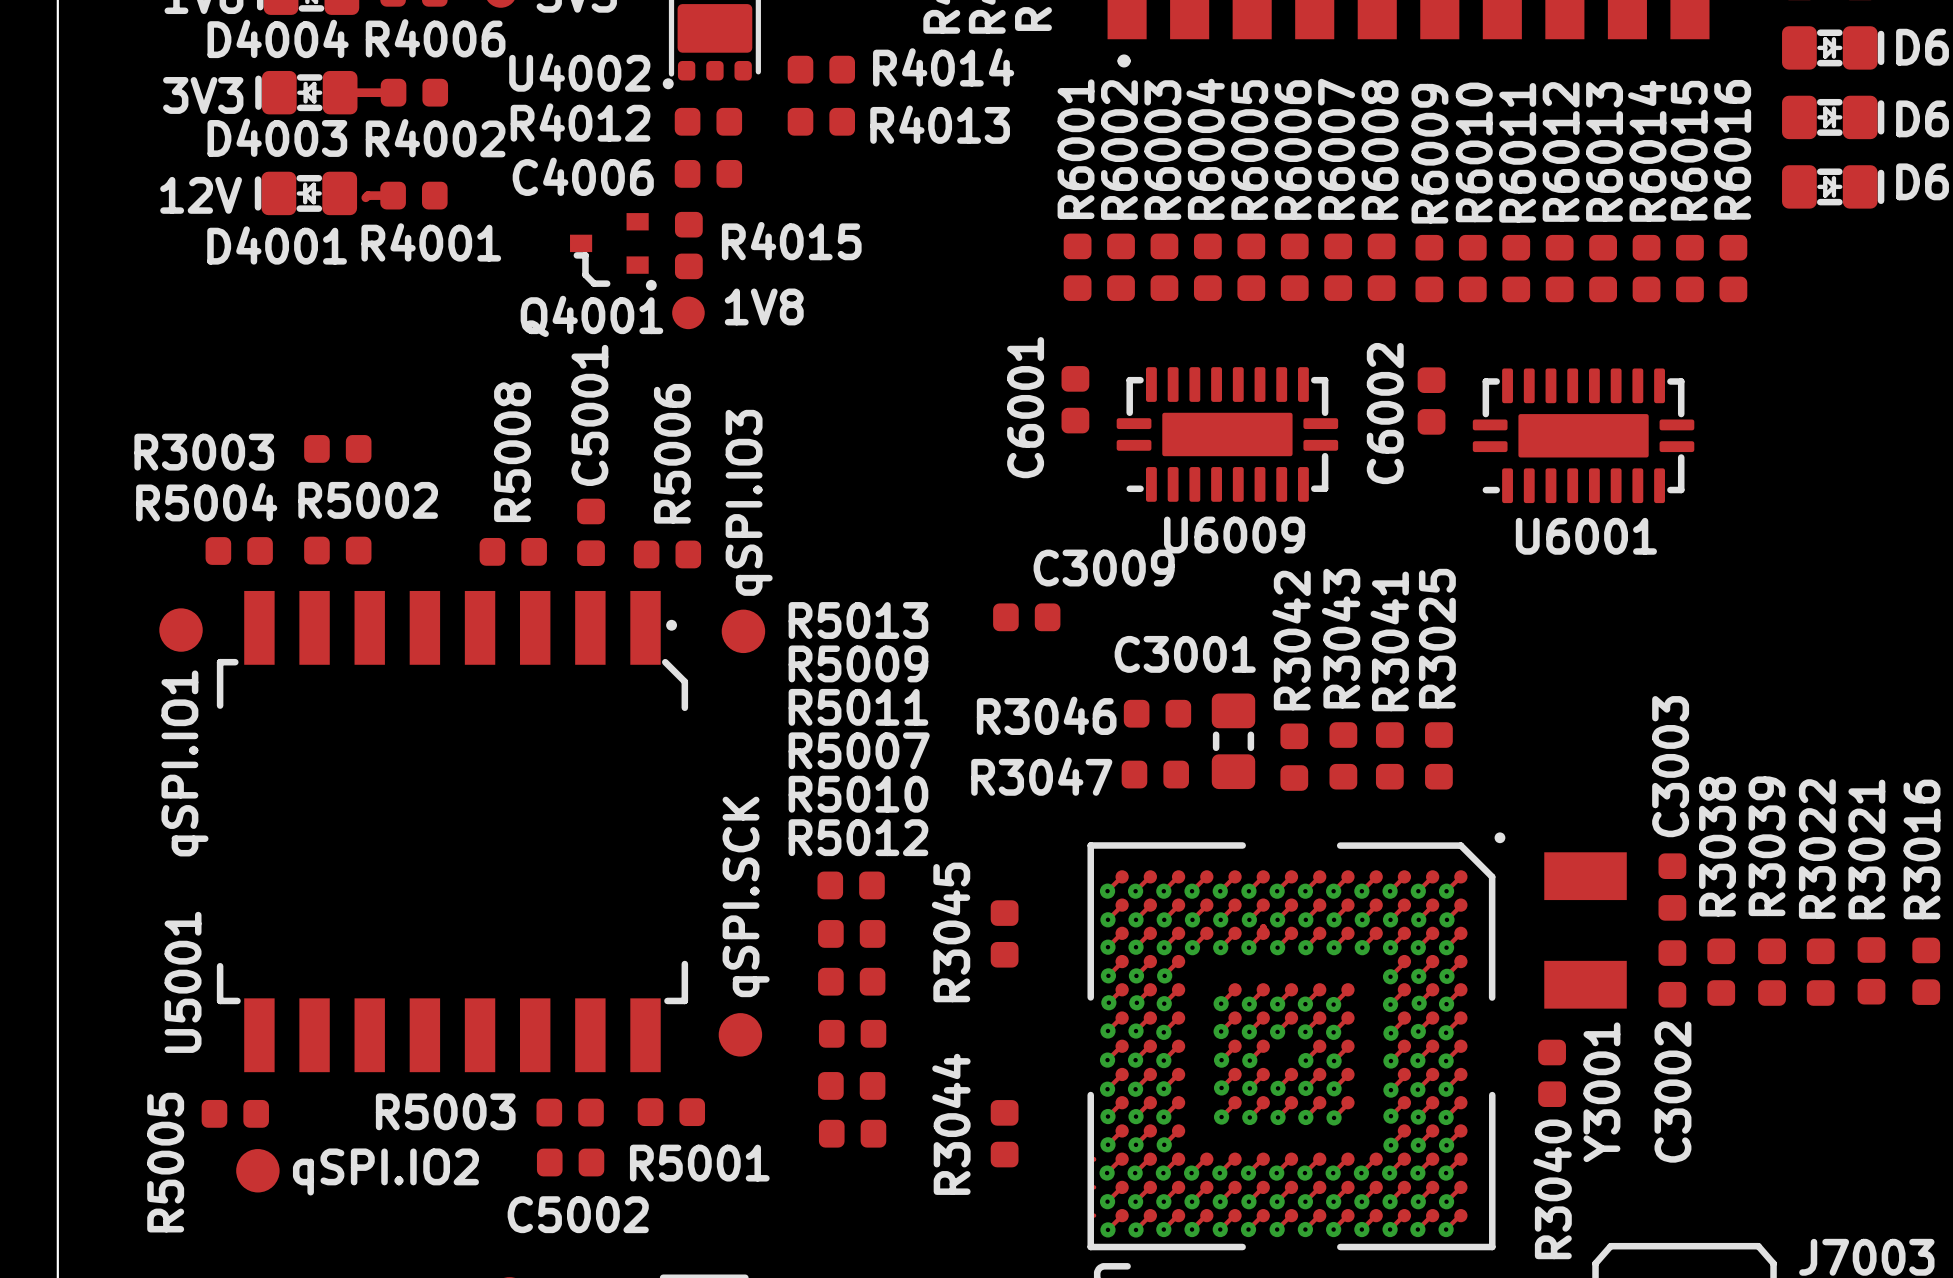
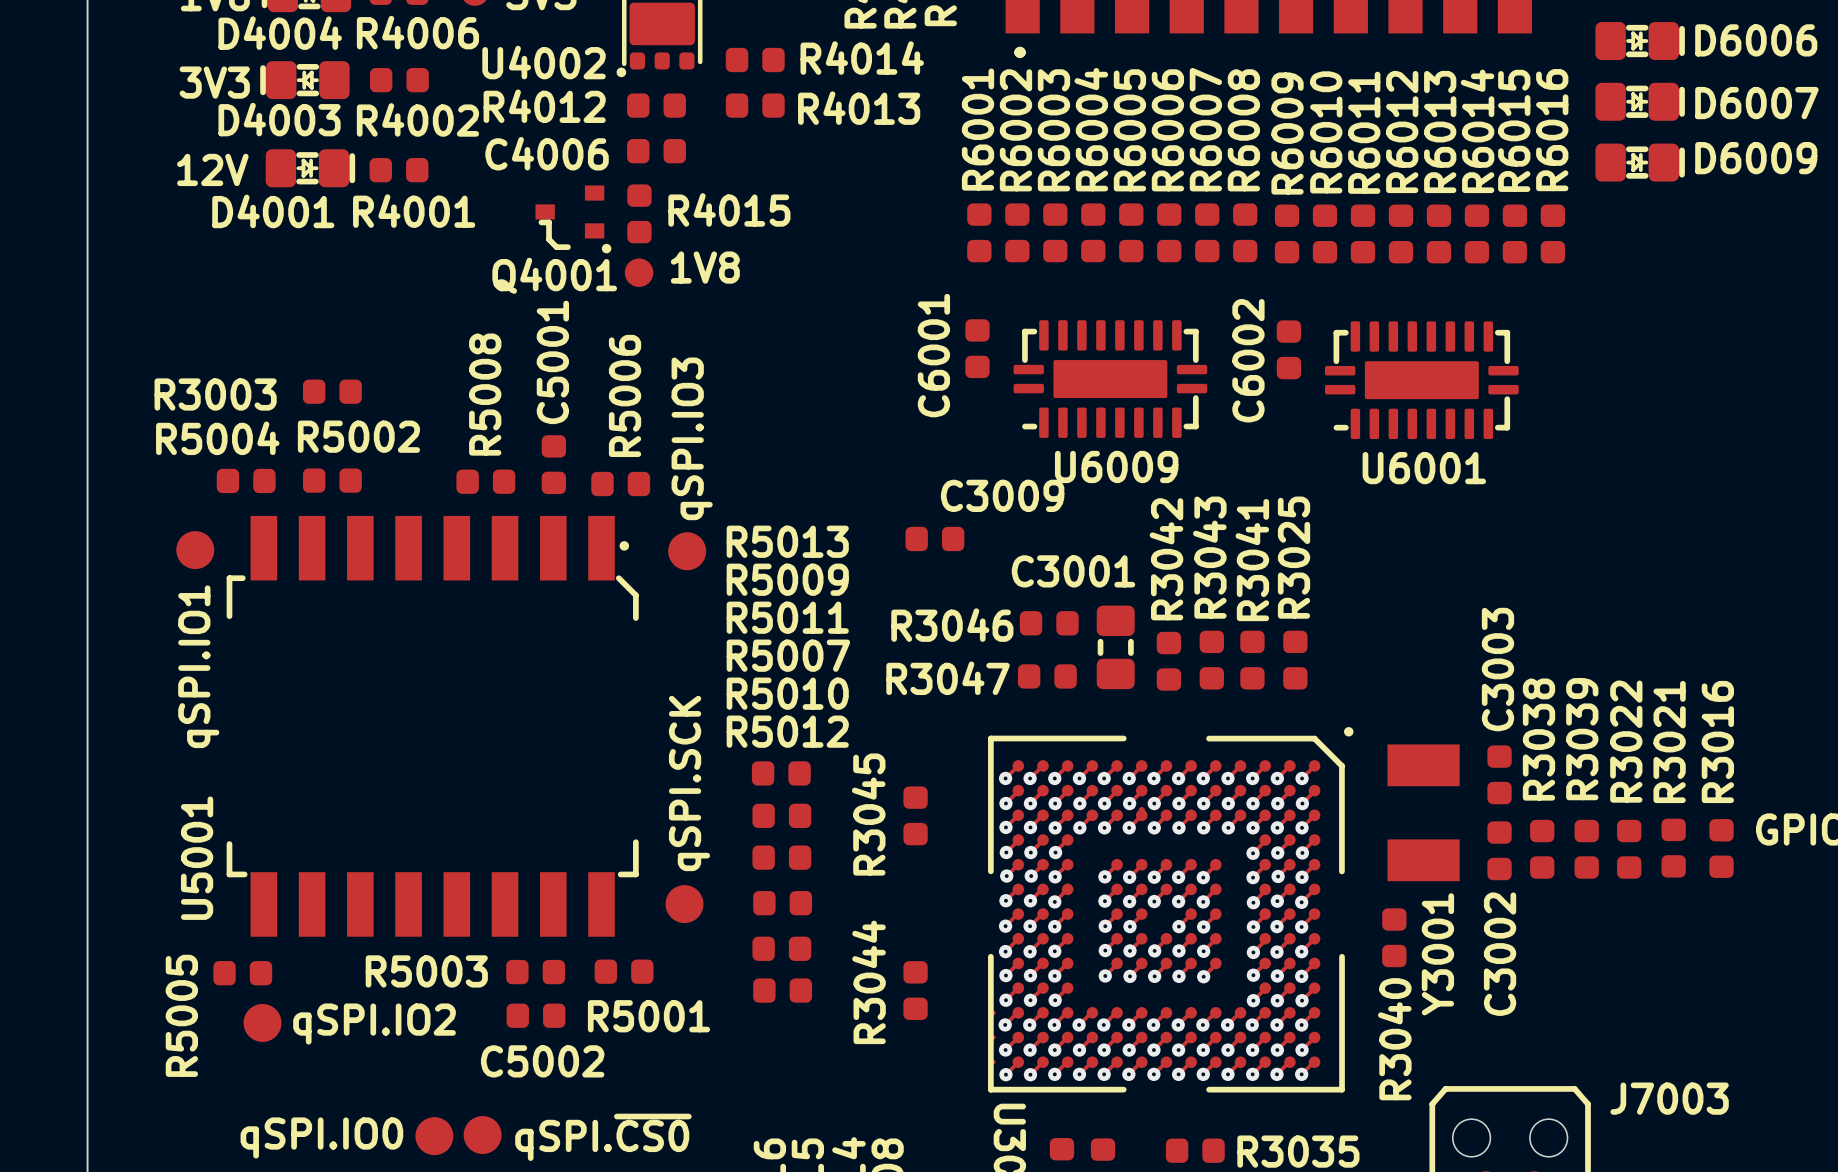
track: (340, 92) (393, 92) -> none
D4001 rotation: 0° (305, 193) -> 180° (310, 168)
track: (393, 195) (367, 195) (365, 197) -> none

